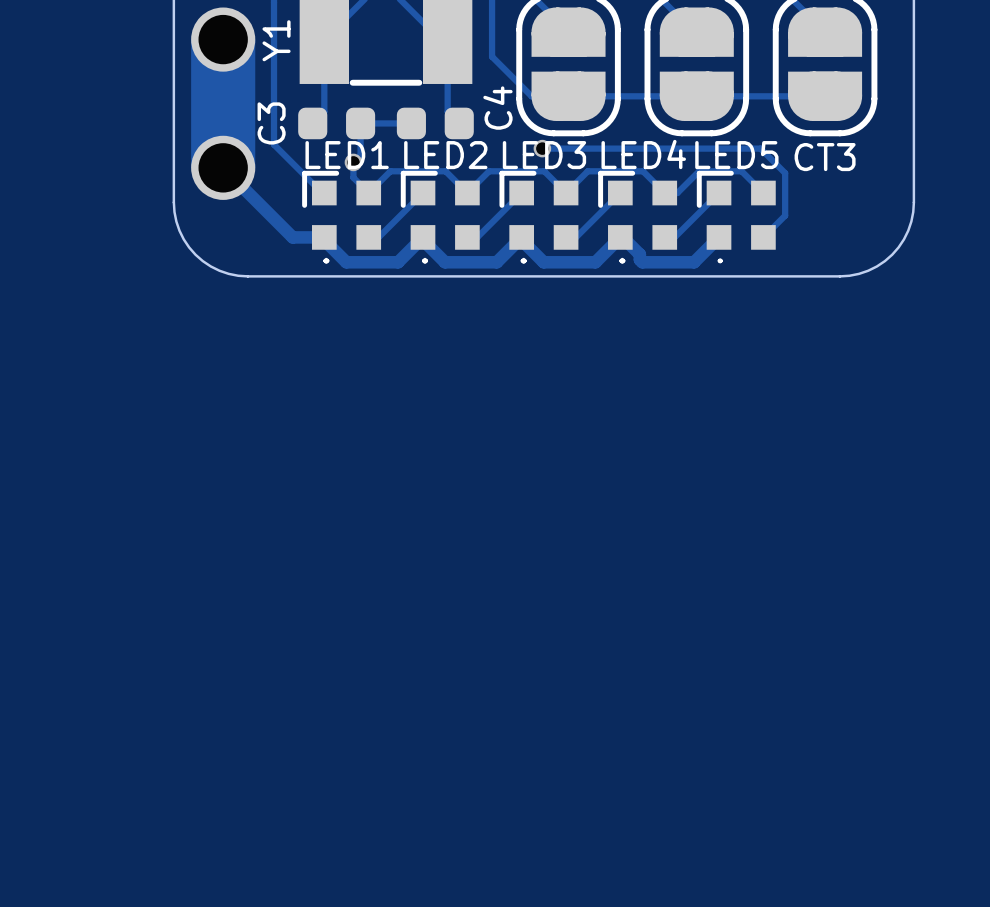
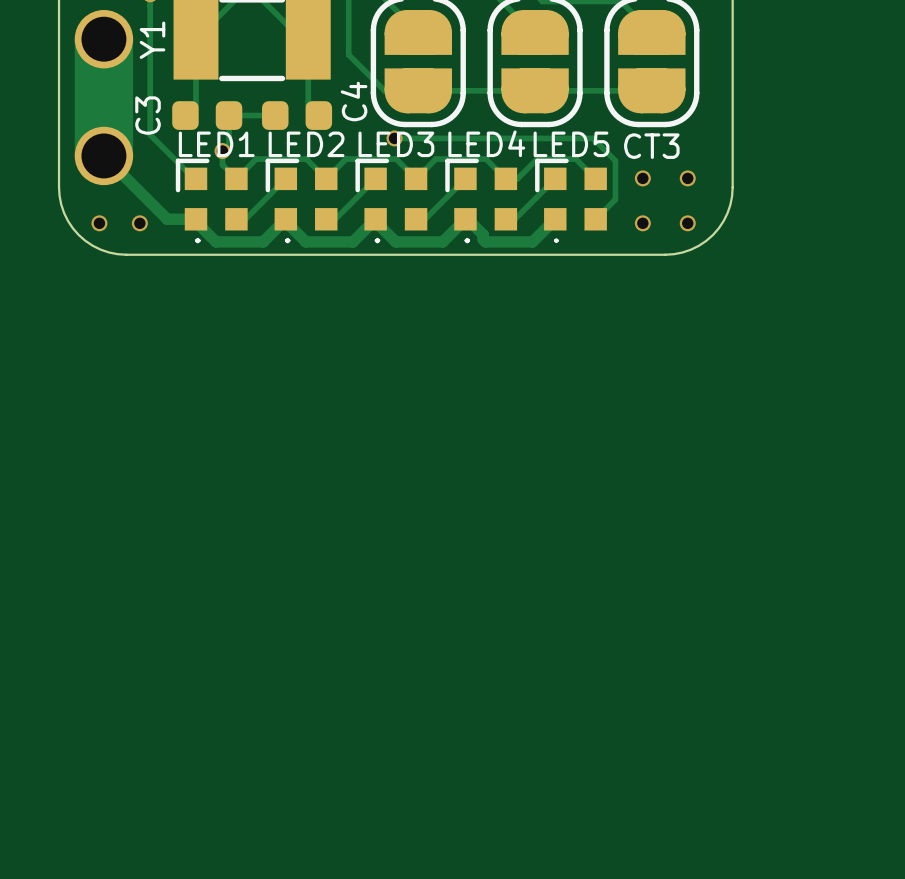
via: none -> (642, 178)
via: none -> (687, 178)
via: none -> (99, 223)
via: none -> (139, 223)
via: none -> (642, 223)
via: none -> (687, 223)

